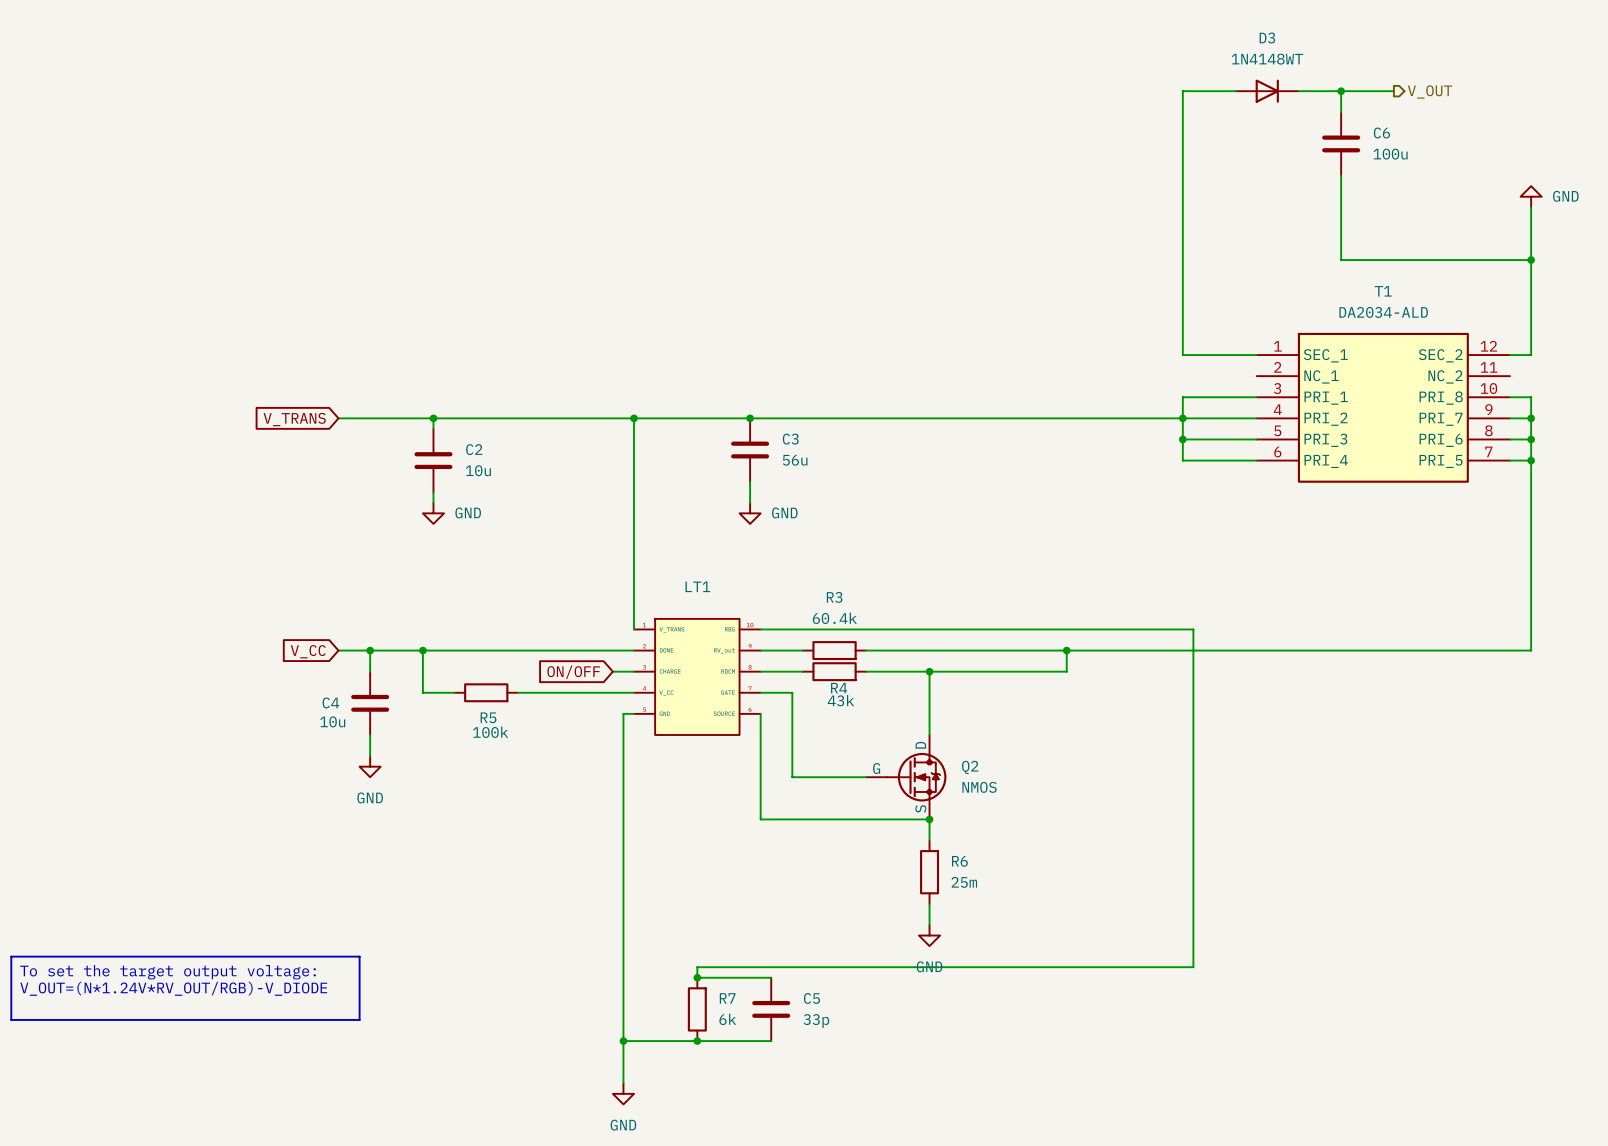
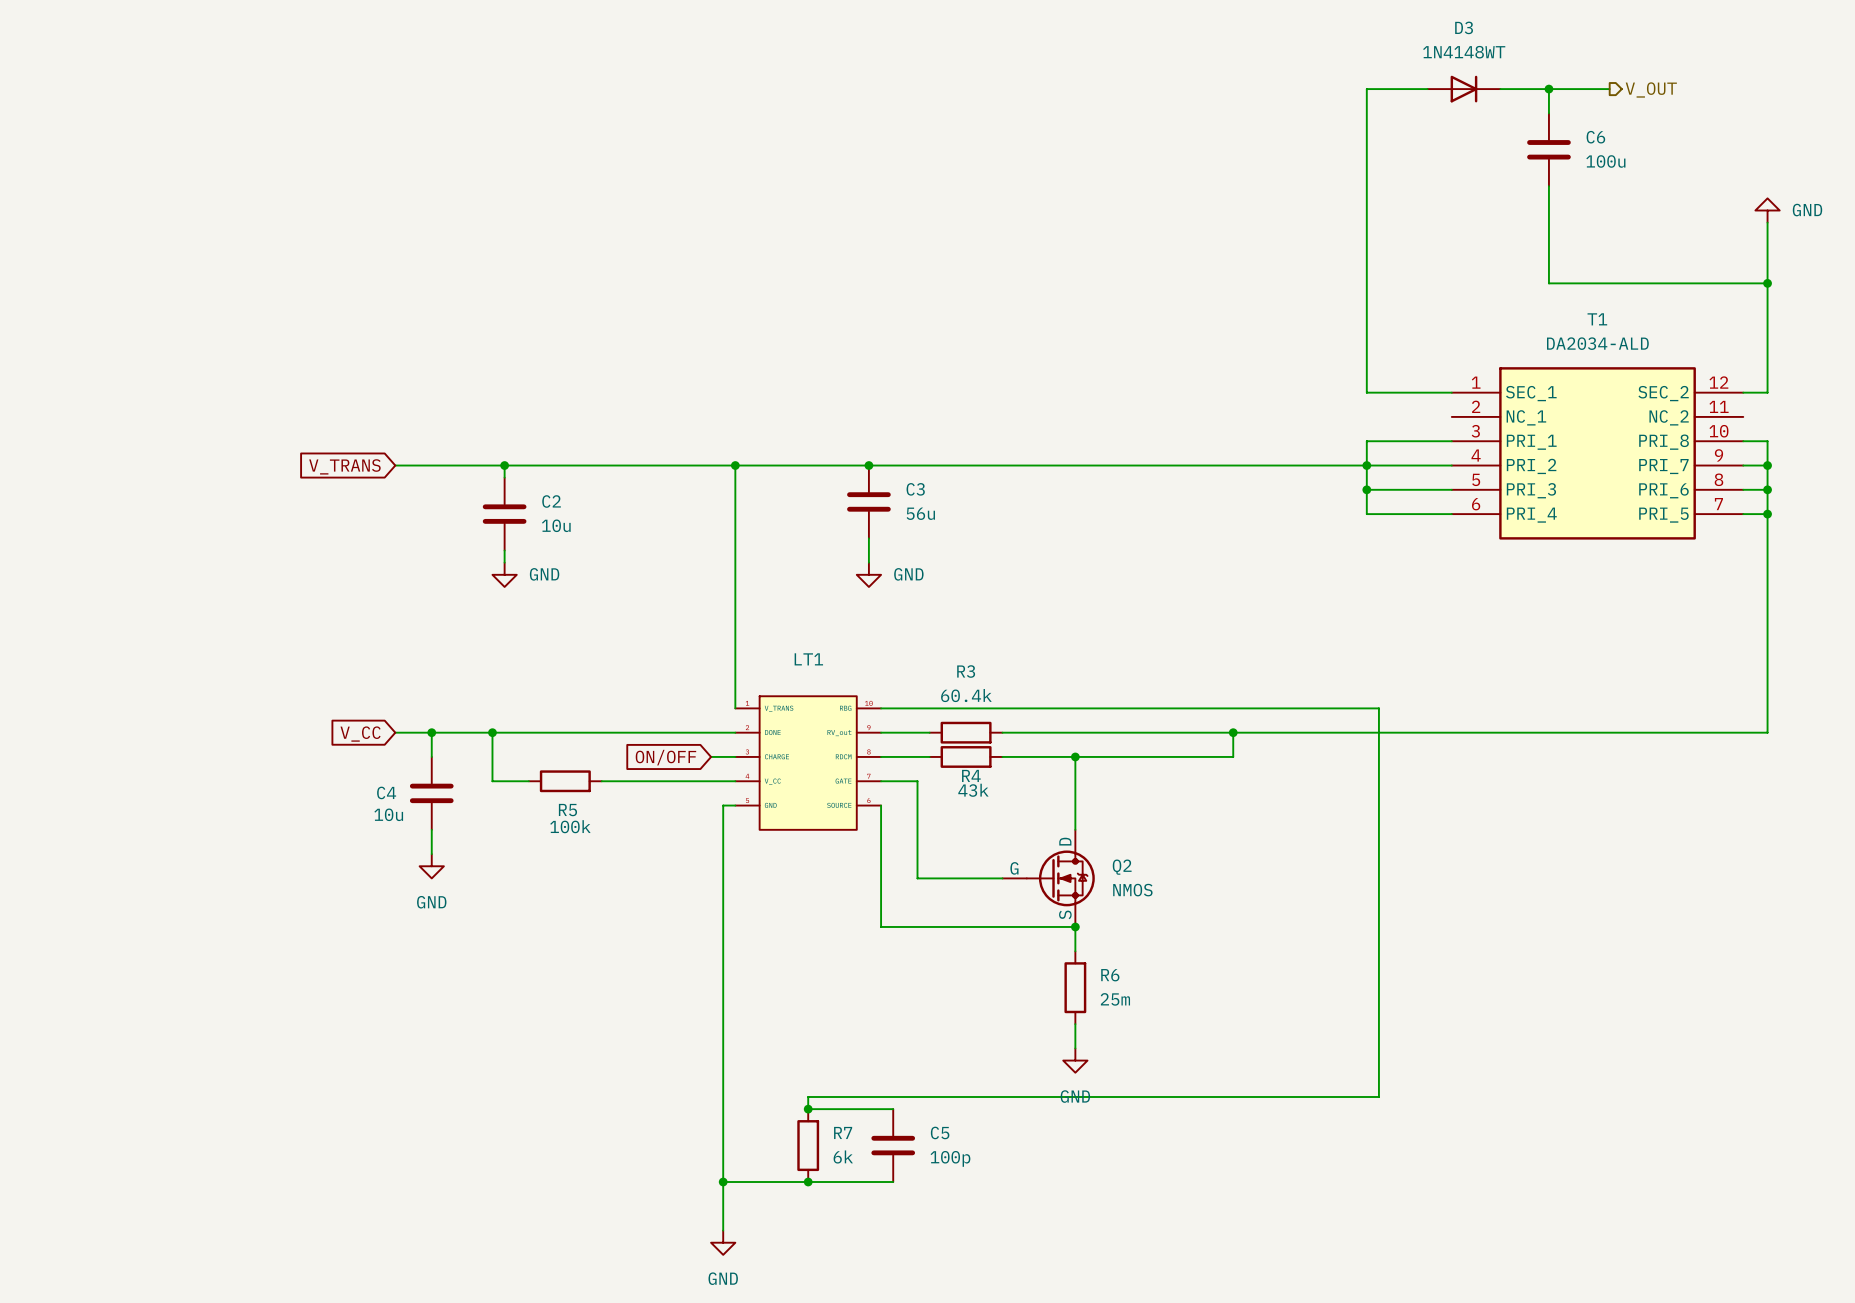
line: (11, 956) (359, 956) (359, 1019) (11, 1019) (11, 956) -> none
text: To set the target output voltage: (168, 972) -> none
text: V_OUT=(N*1.24V*RV_OUT/RGB)-V_DIODE (173, 988) -> none
C5 value: 33p (816, 1020) -> 100p (950, 1158)

